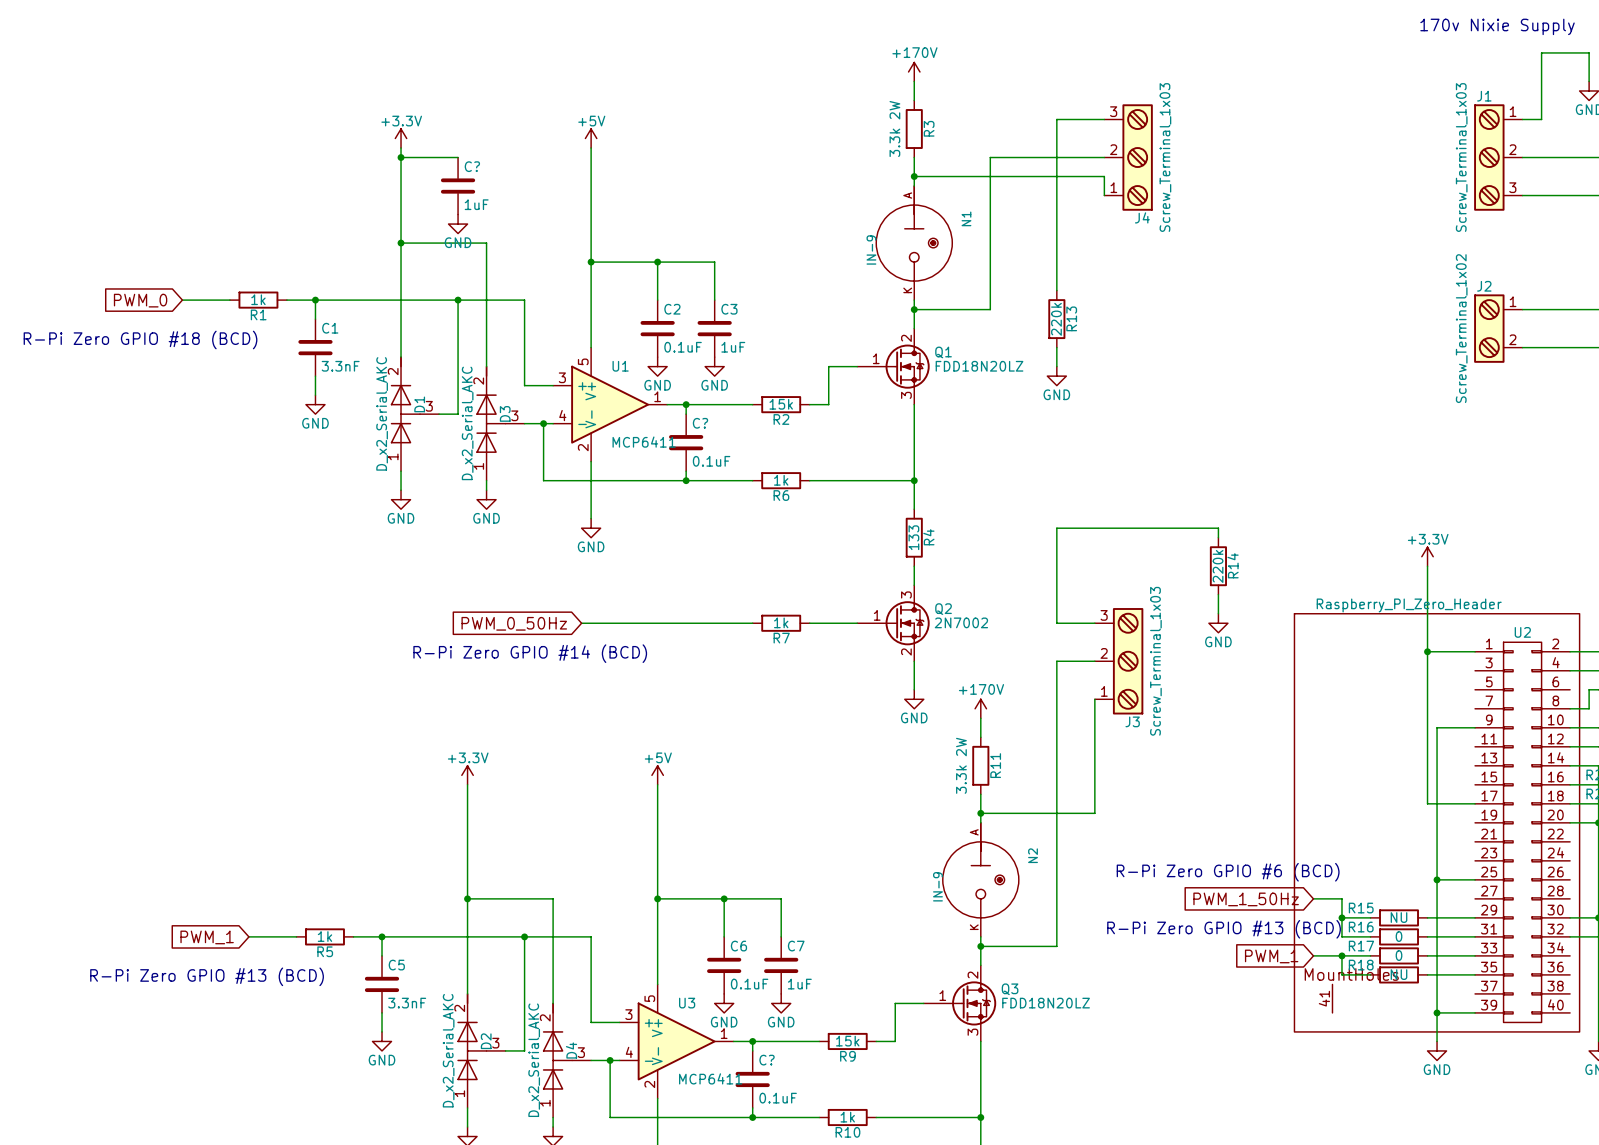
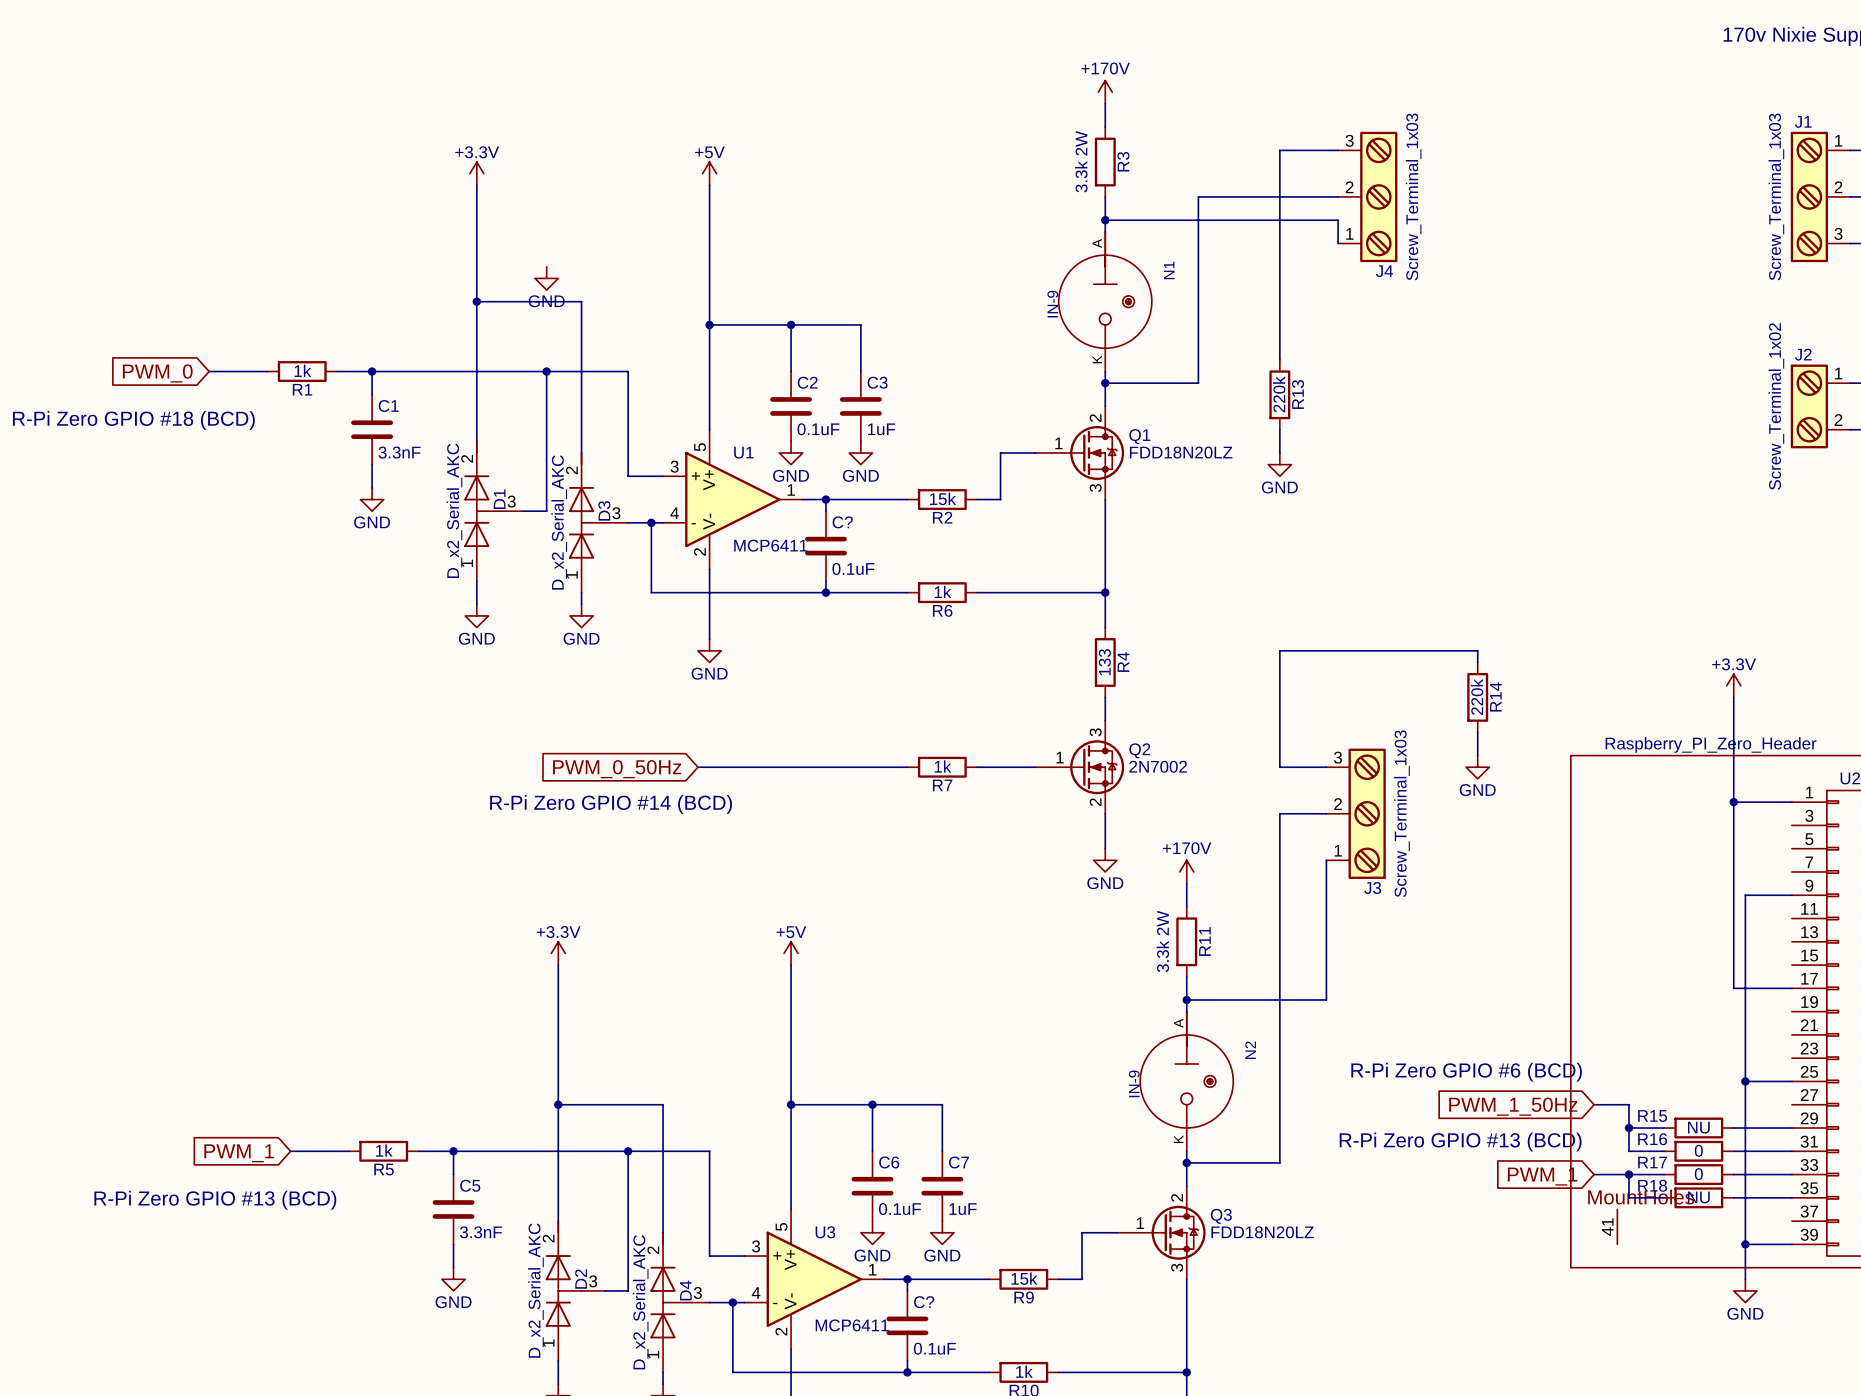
wire: (401, 157) (458, 157) -> none
junction: (401, 157) -> none
C?: 1uF (458, 186) -> none

